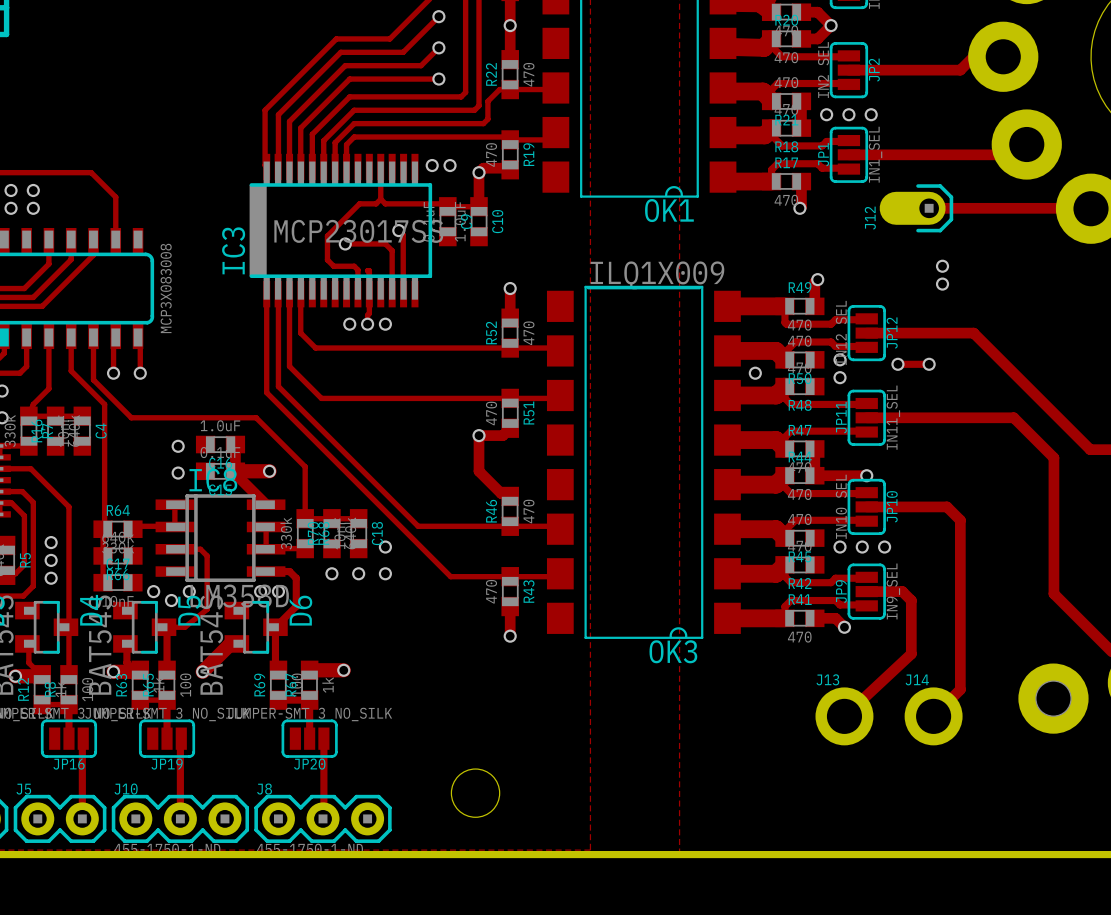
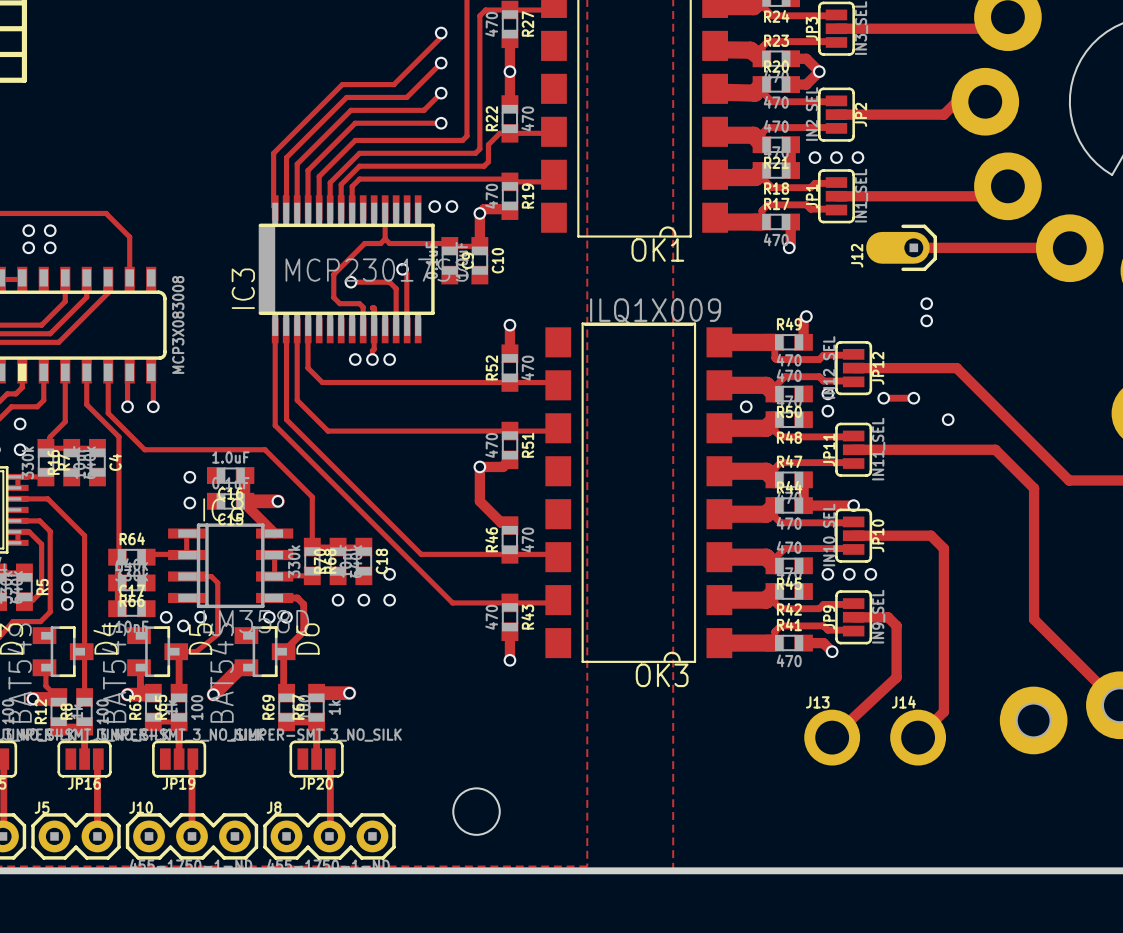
via: none -> (948, 419)

